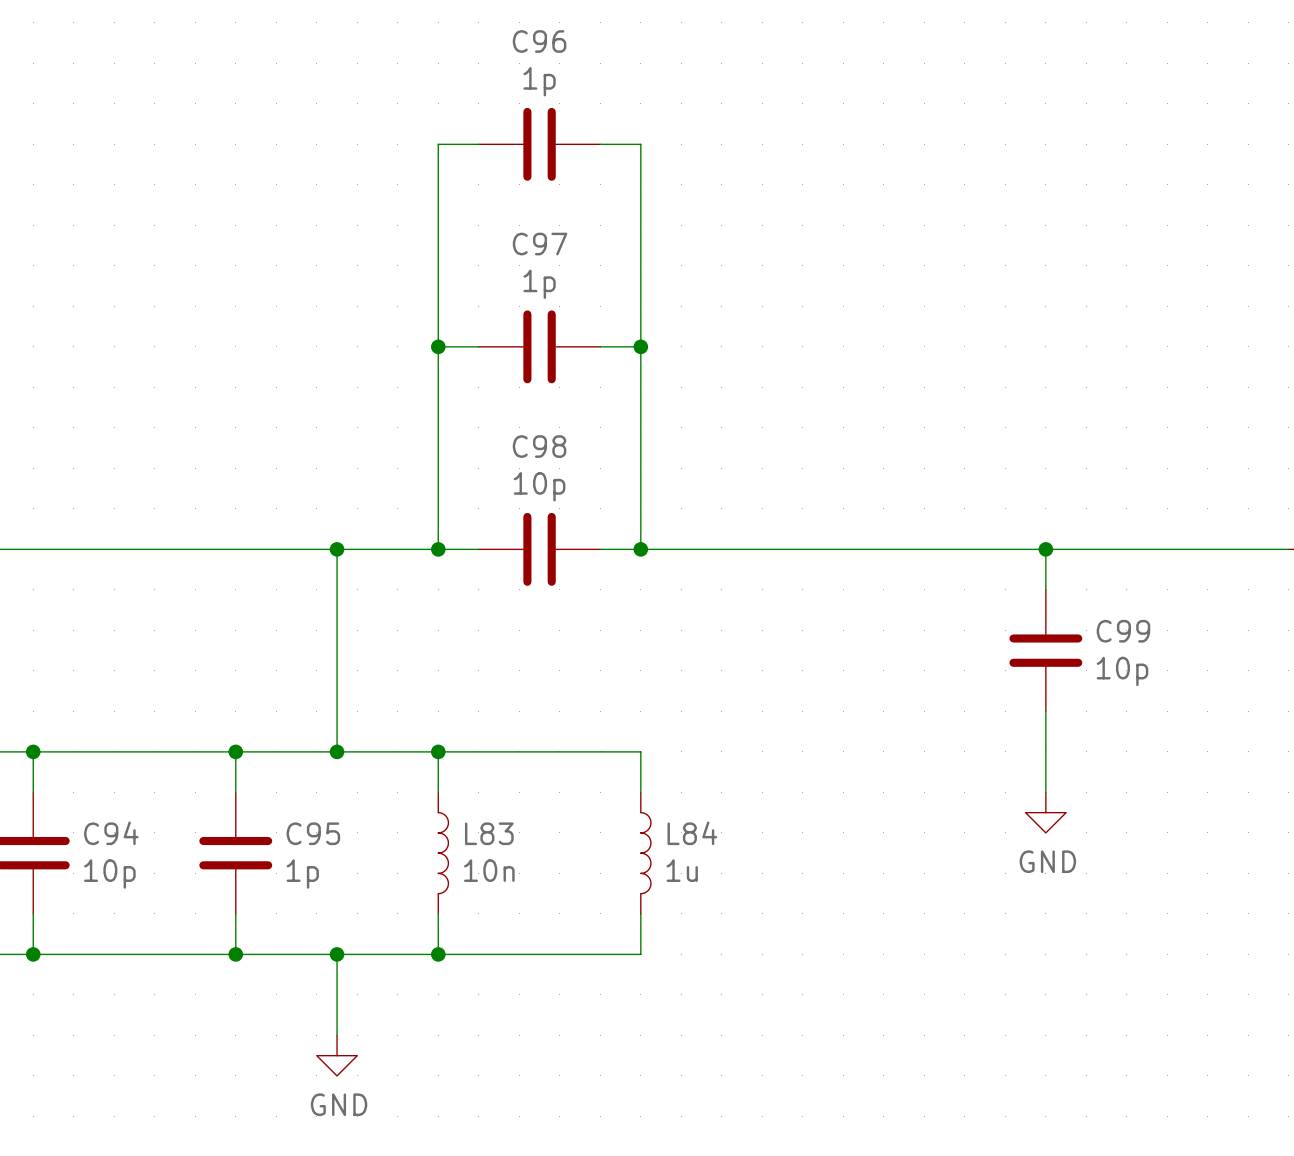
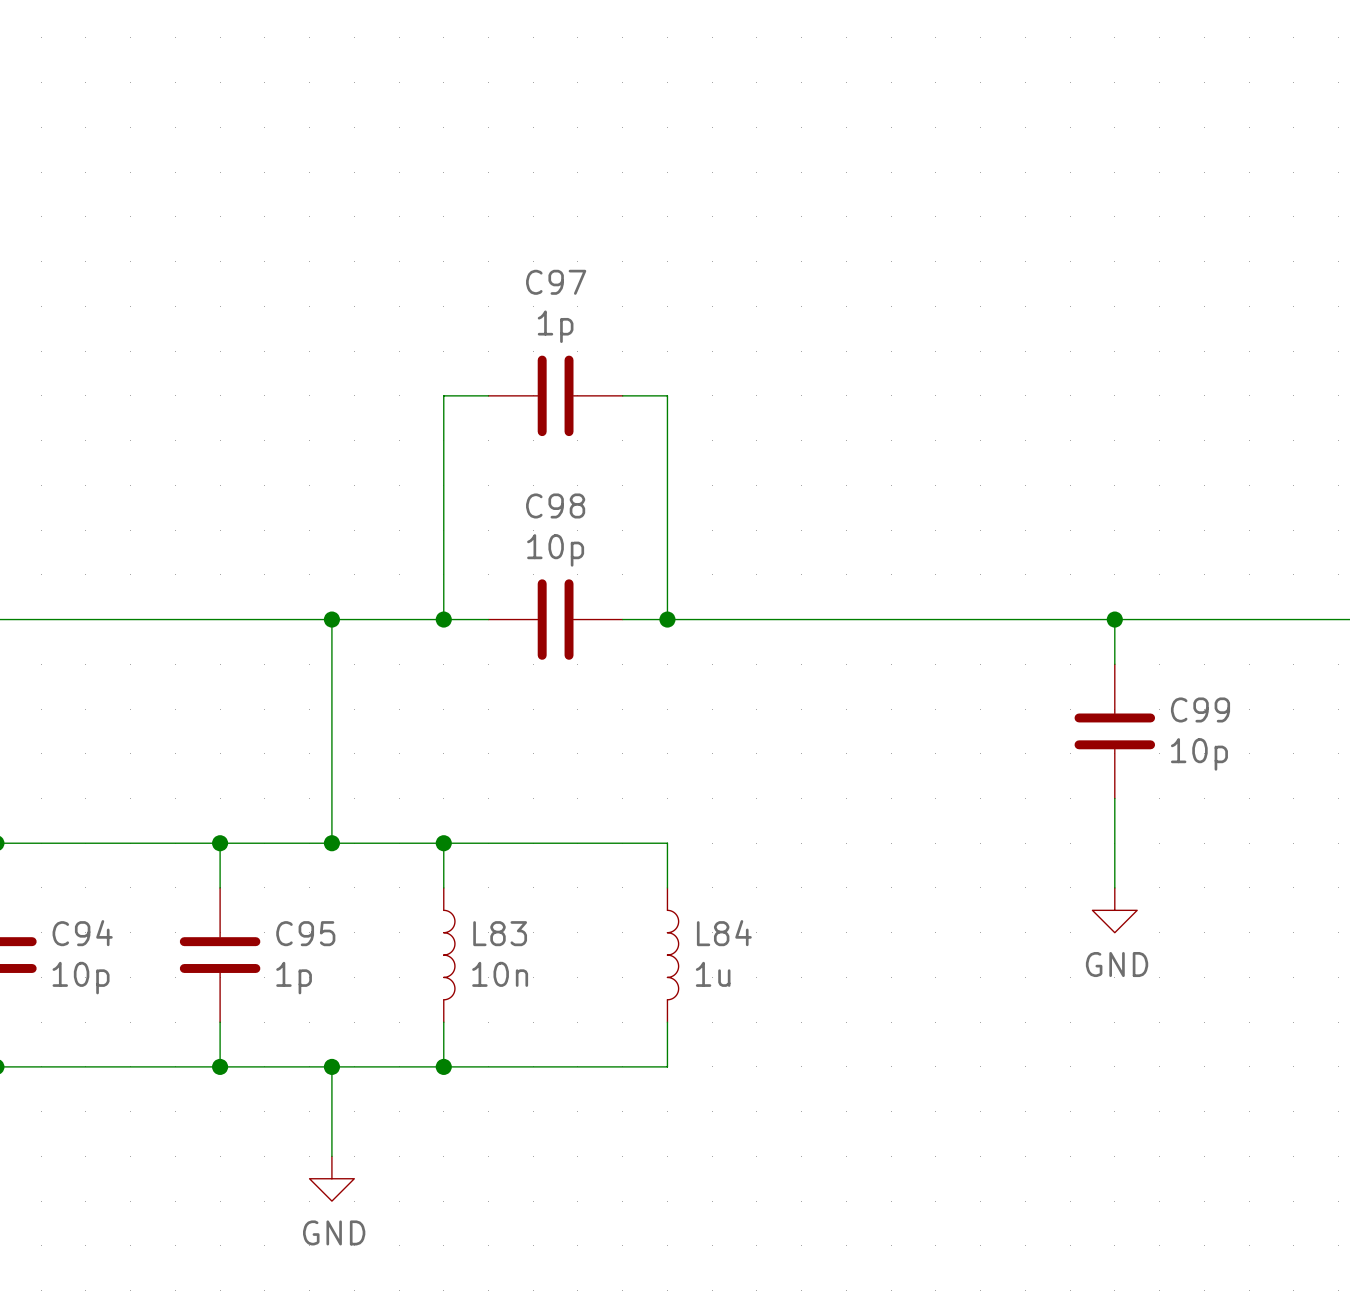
wire: (478, 144) (438, 144) (438, 346) -> none
C96: 1p (539, 144) -> none
wire: (600, 144) (640, 144) (640, 346) -> none
junction: (438, 346) -> none
junction: (640, 346) -> none

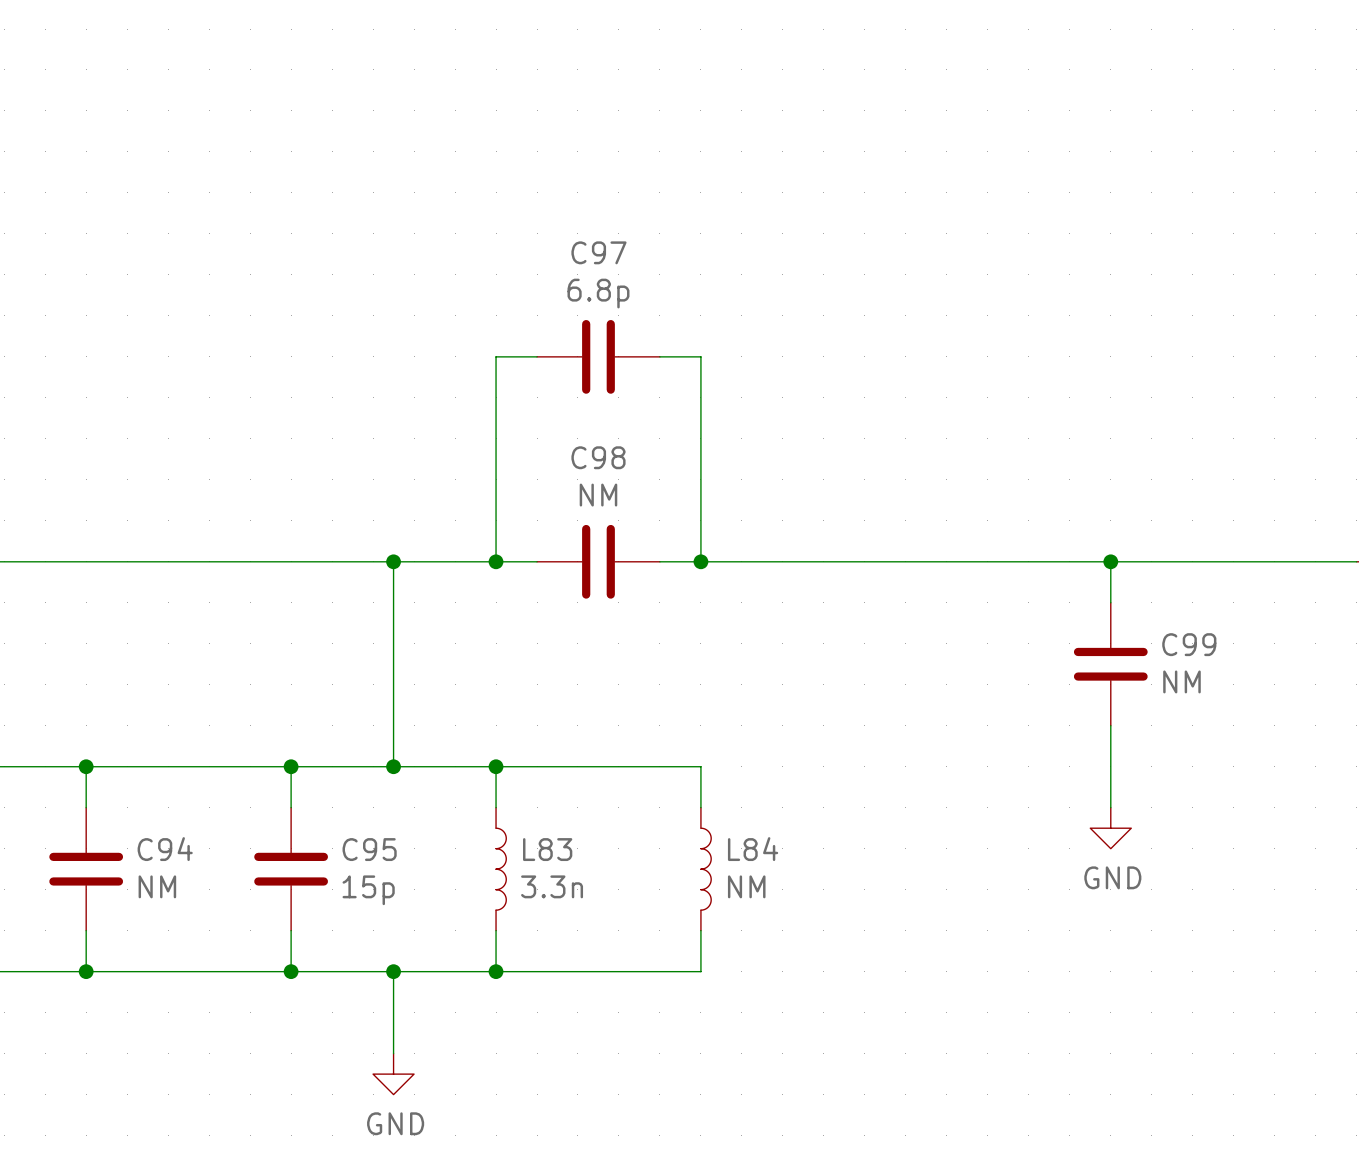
C97 value: 1p (555, 326) -> 6.8p (598, 293)
C98 value: 10p (555, 550) -> NM (598, 495)
C99 value: 10p (1199, 754) -> NM (1181, 681)
L83 value: 10n (500, 974) -> 3.3n (552, 886)
L84 value: 1u (713, 974) -> NM (746, 886)
C94 value: 10p (81, 978) -> NM (157, 886)
C95 value: 1p (294, 978) -> 15p (368, 890)

